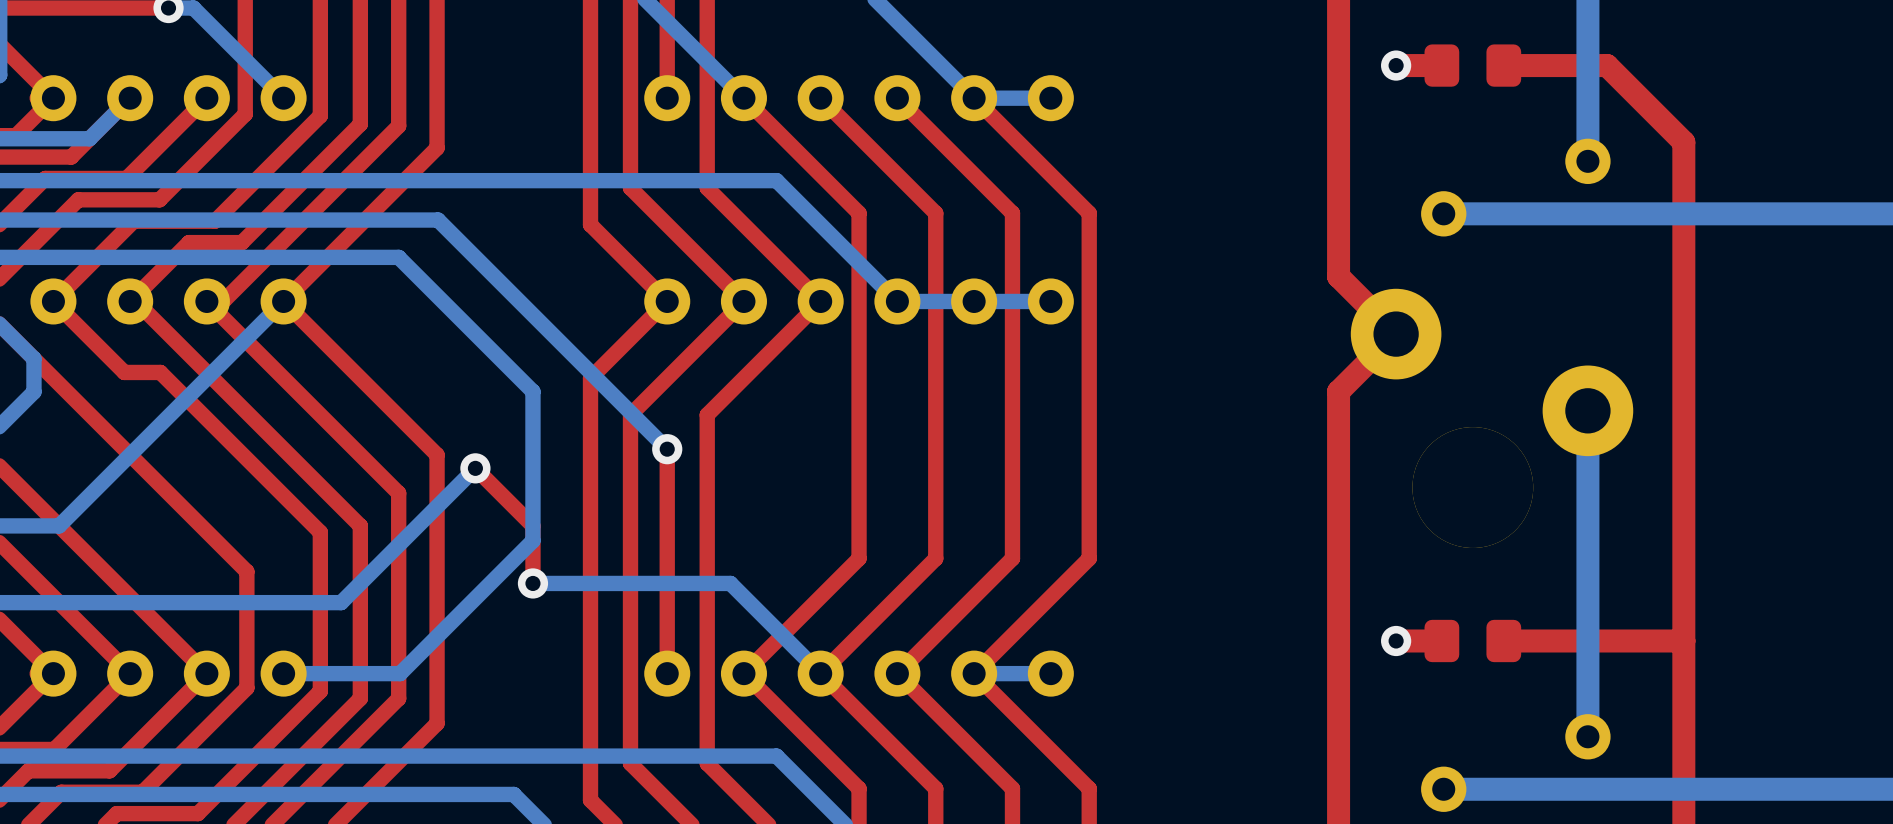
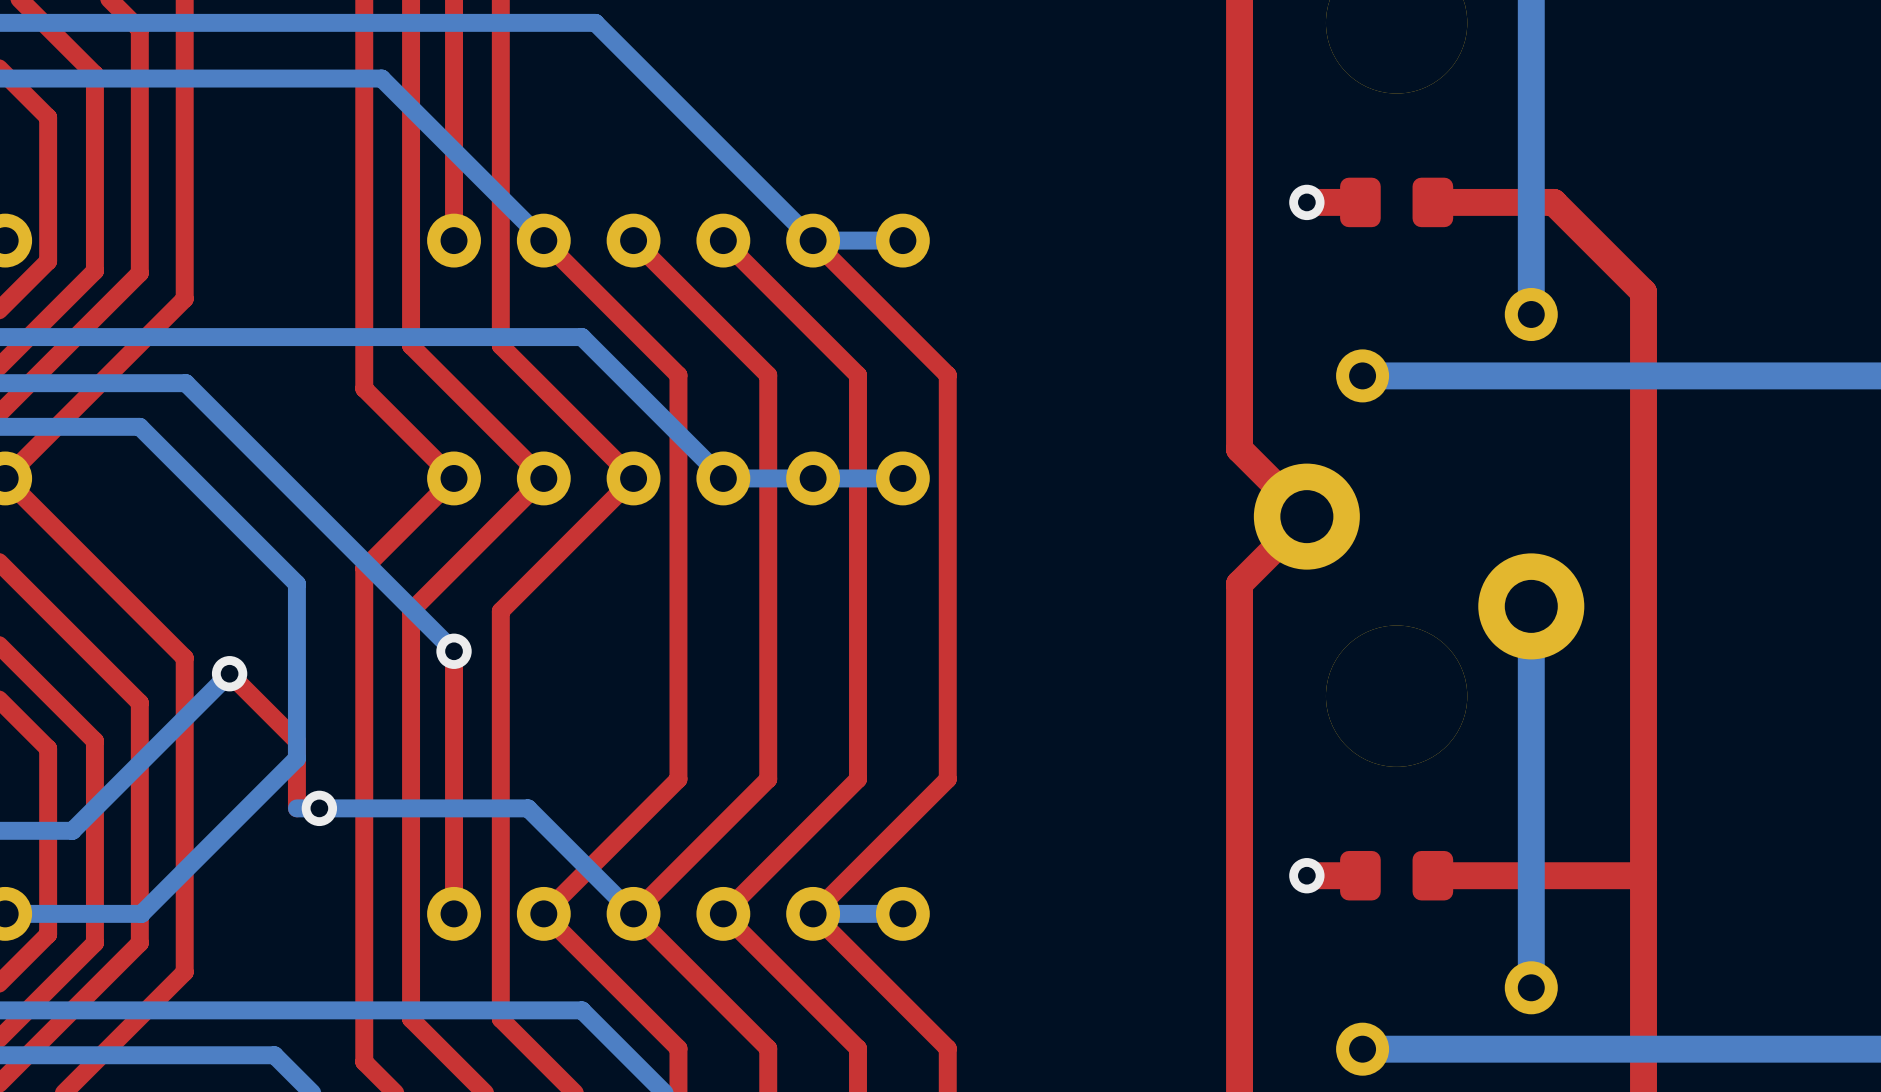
via position: (532, 583) -> (319, 808)

